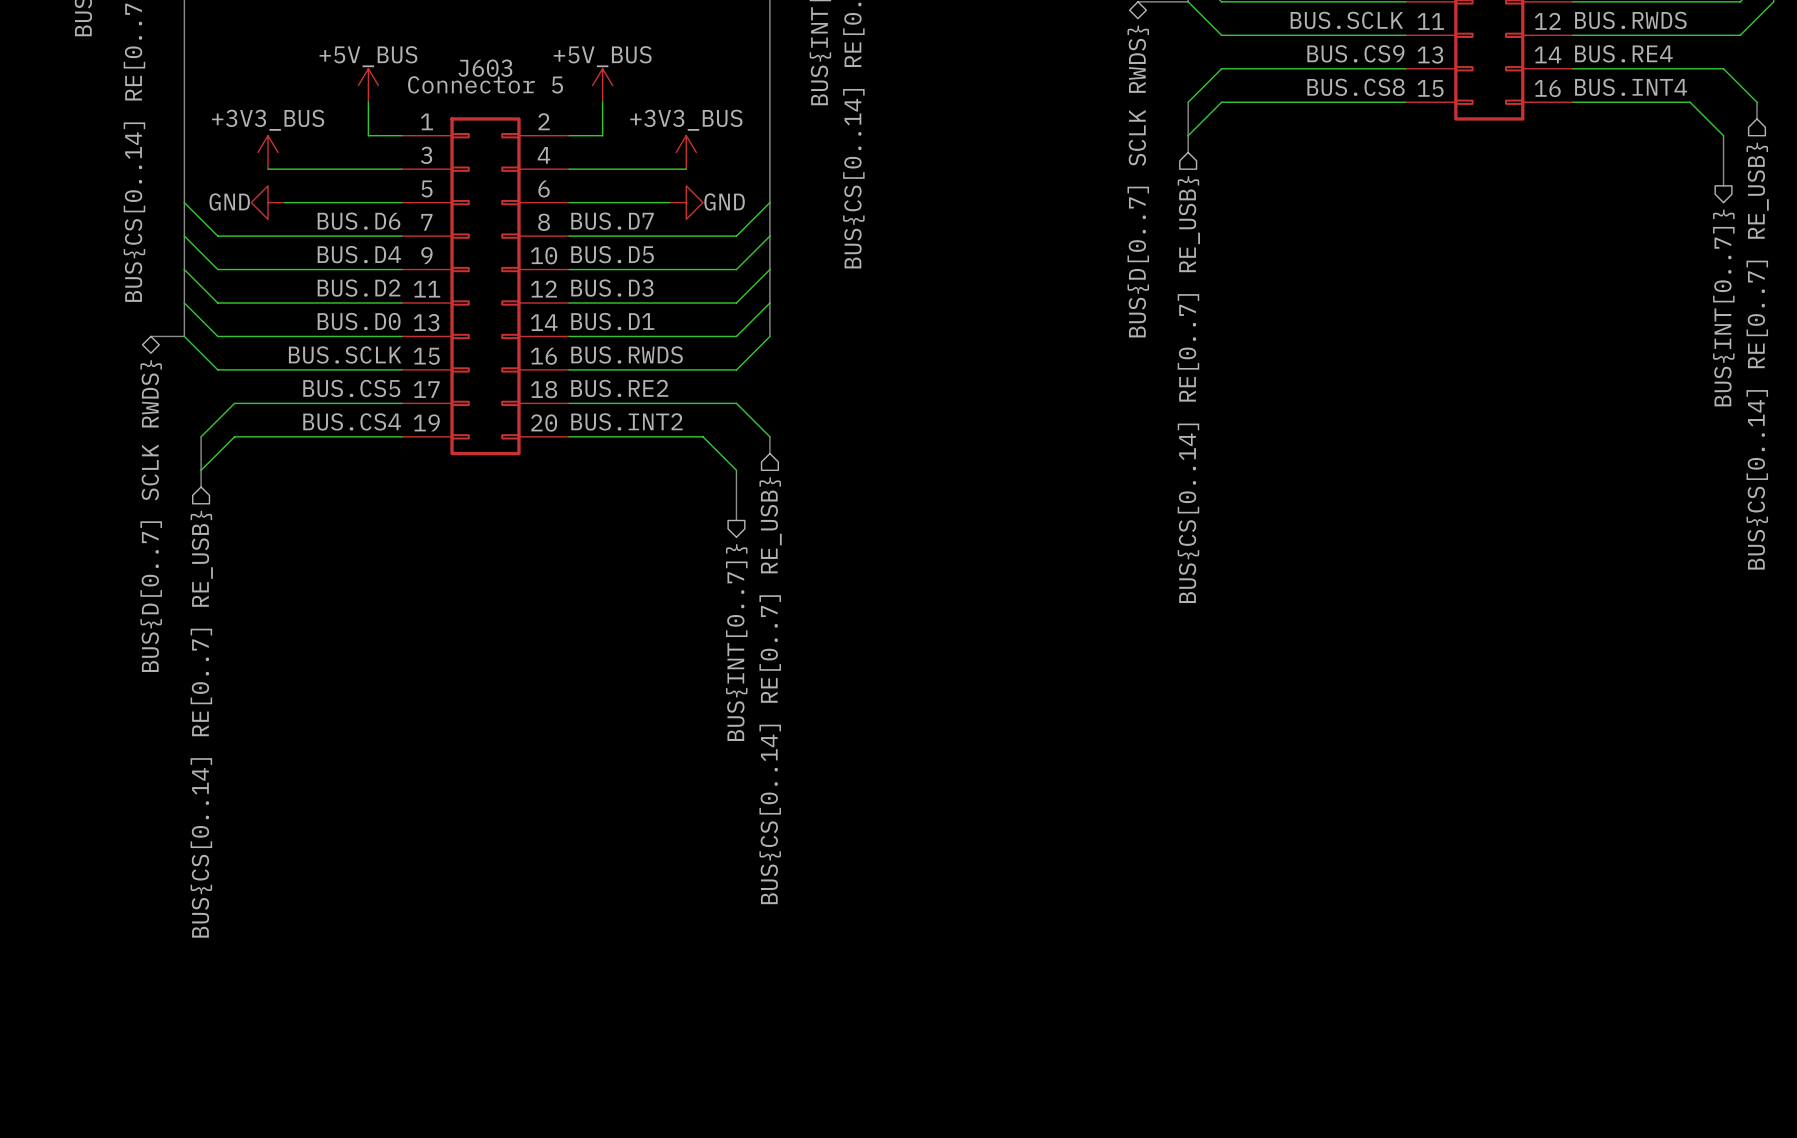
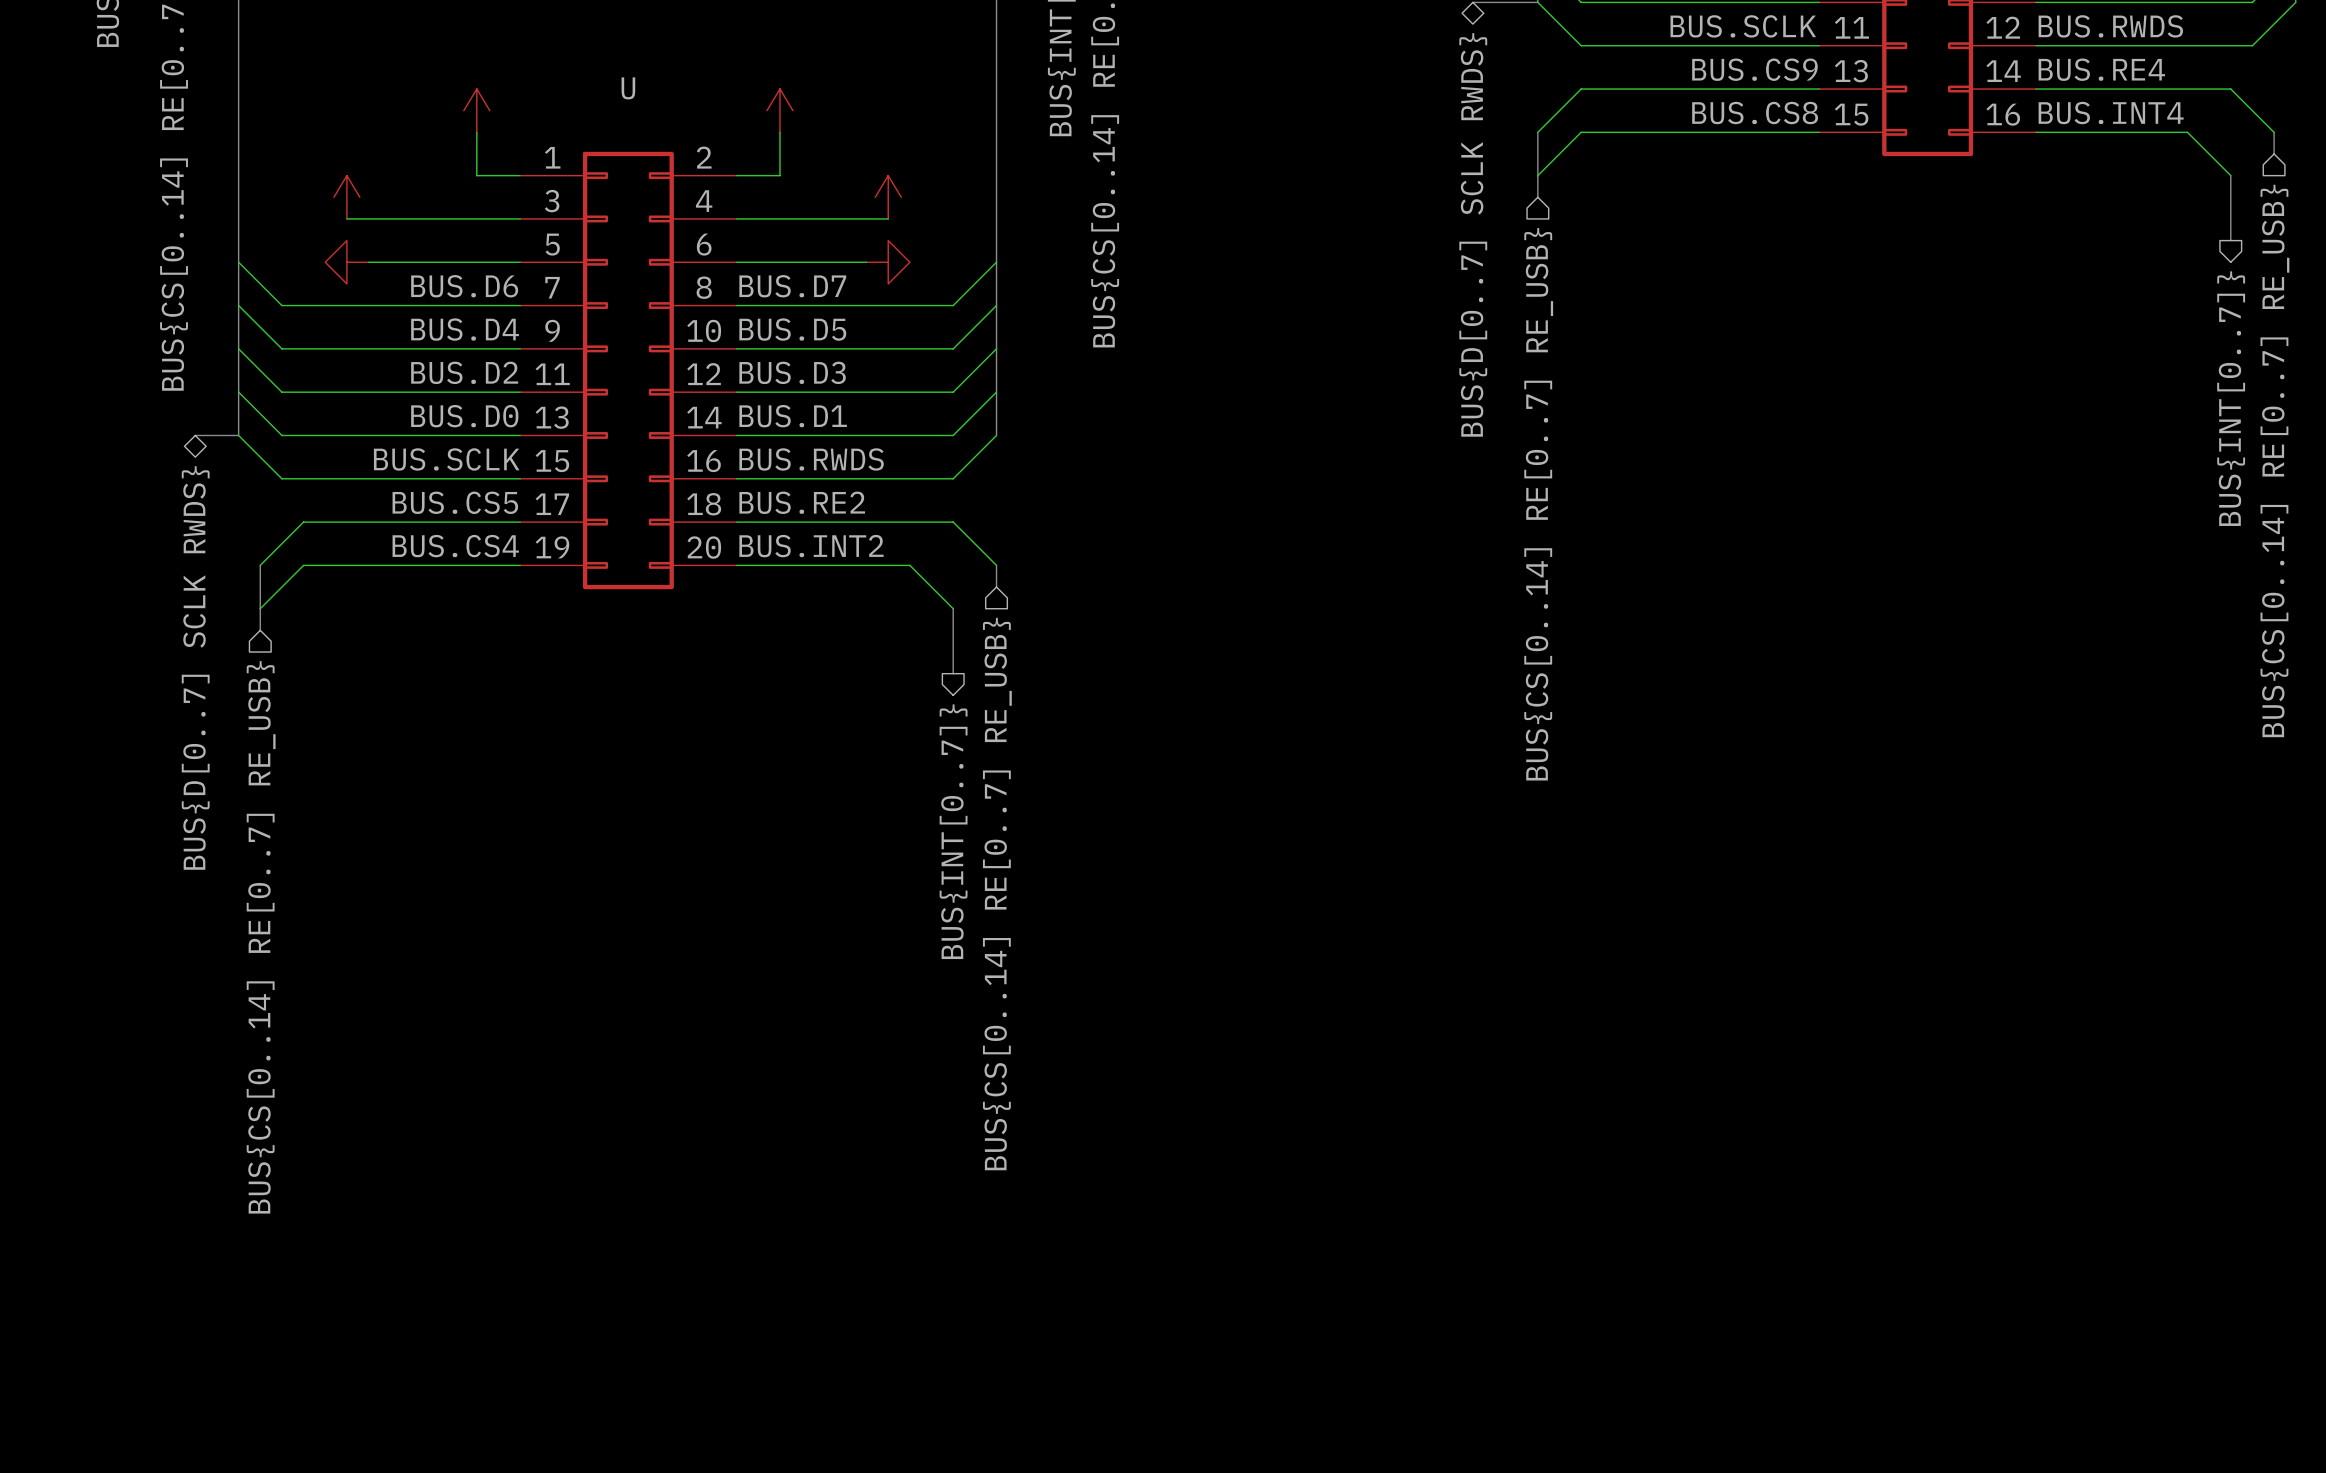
power symbol text: +5V_BUS (368, 56) -> none
power symbol text: +5V_BUS (602, 56) -> none
J603 name: J603 (485, 68) -> U (628, 88)
J603 value: Connector 5 (485, 84) -> none
power symbol text: +3V3_BUS (268, 120) -> none
power symbol text: +3V3_BUS (686, 120) -> none
power symbol text: GND (229, 201) -> none
power symbol text: GND (724, 201) -> none

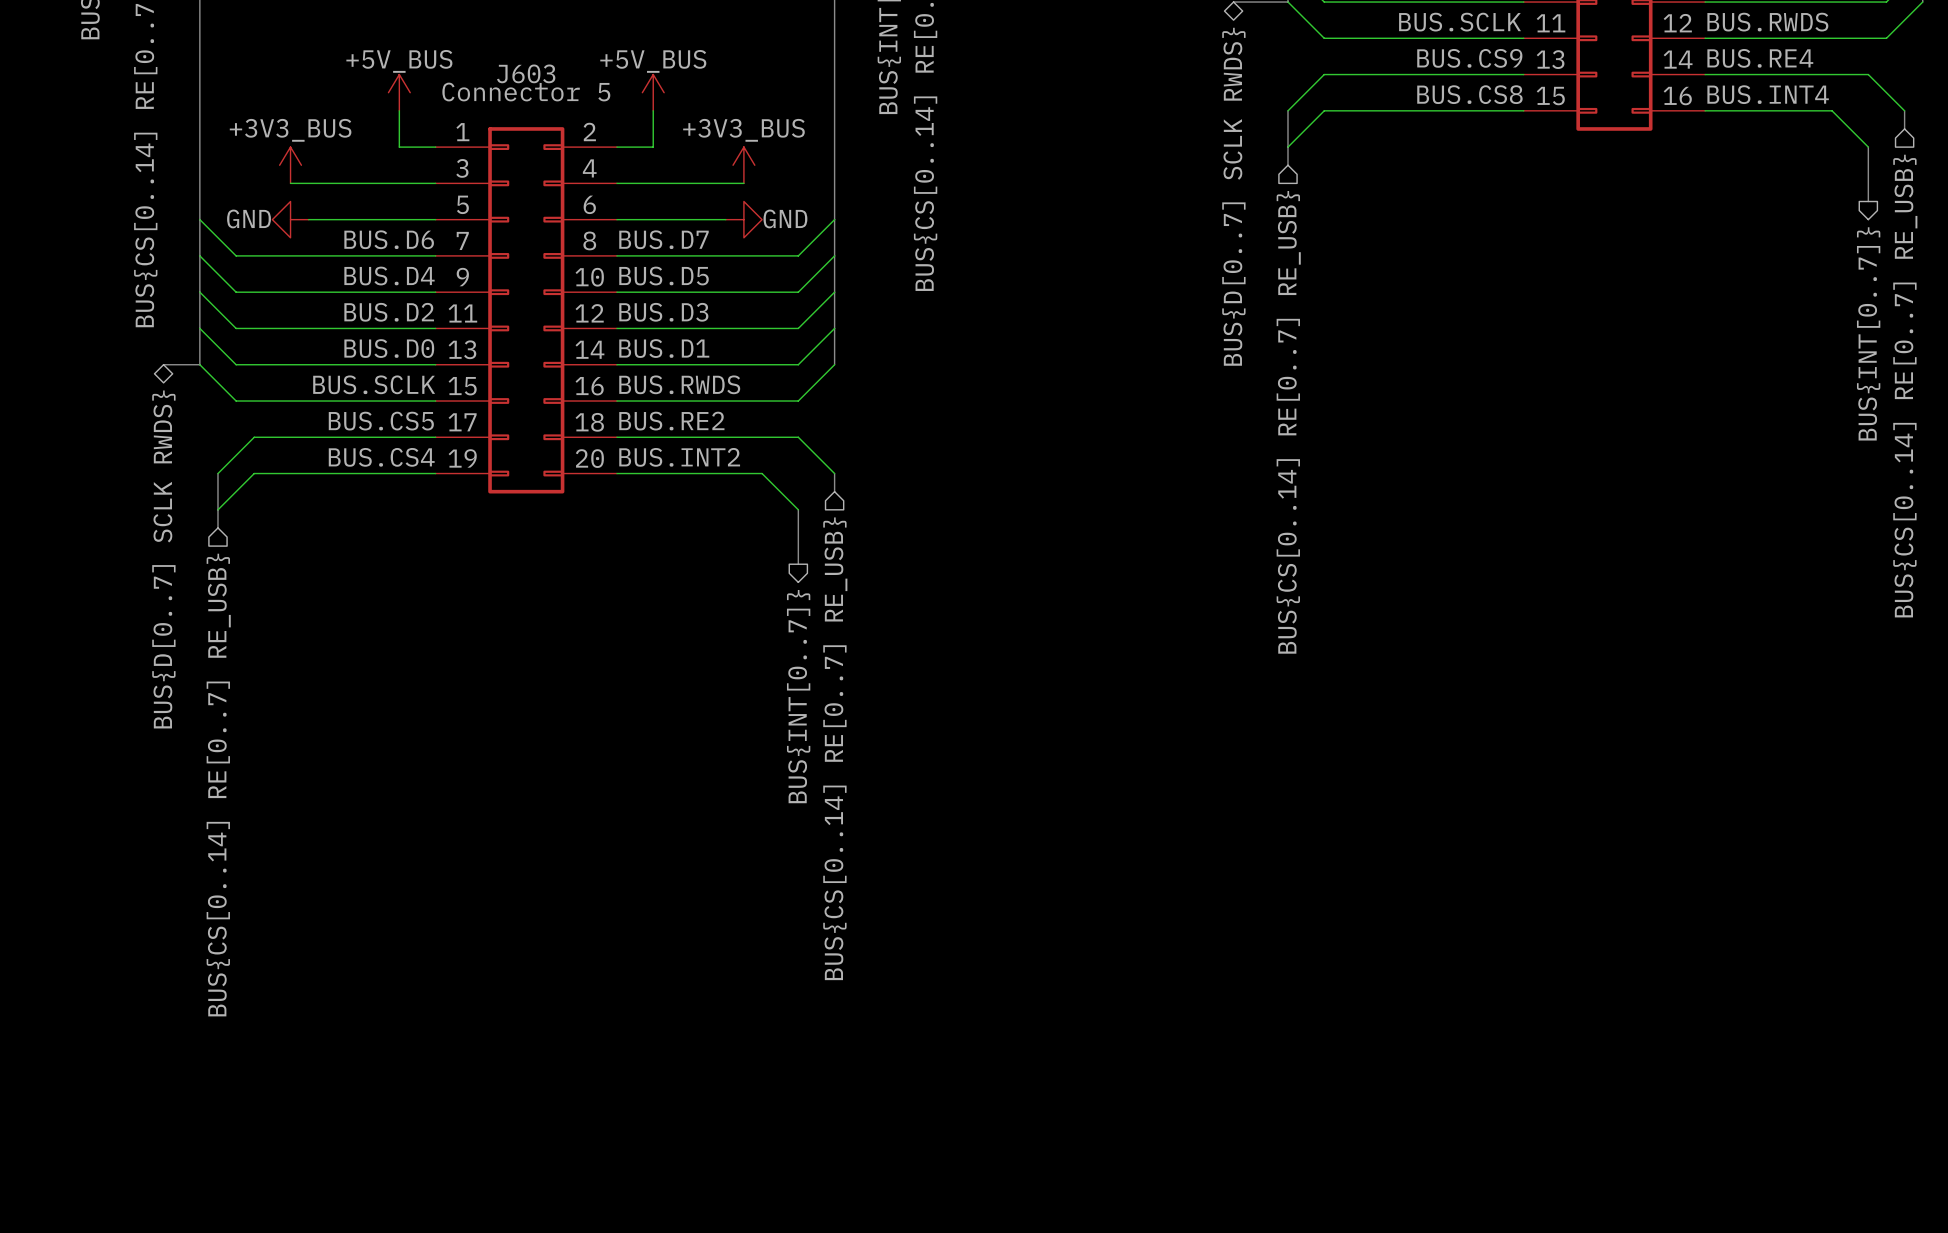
power symbol text: none -> +5V_BUS (399, 61)
power symbol text: none -> +5V_BUS (653, 61)
U name: U (628, 88) -> J603 (526, 73)
U value: none -> Connector 5 (526, 92)
power symbol text: none -> +3V3_BUS (290, 130)
power symbol text: none -> +3V3_BUS (743, 130)
power symbol text: none -> GND (249, 218)
power symbol text: none -> GND (785, 218)

